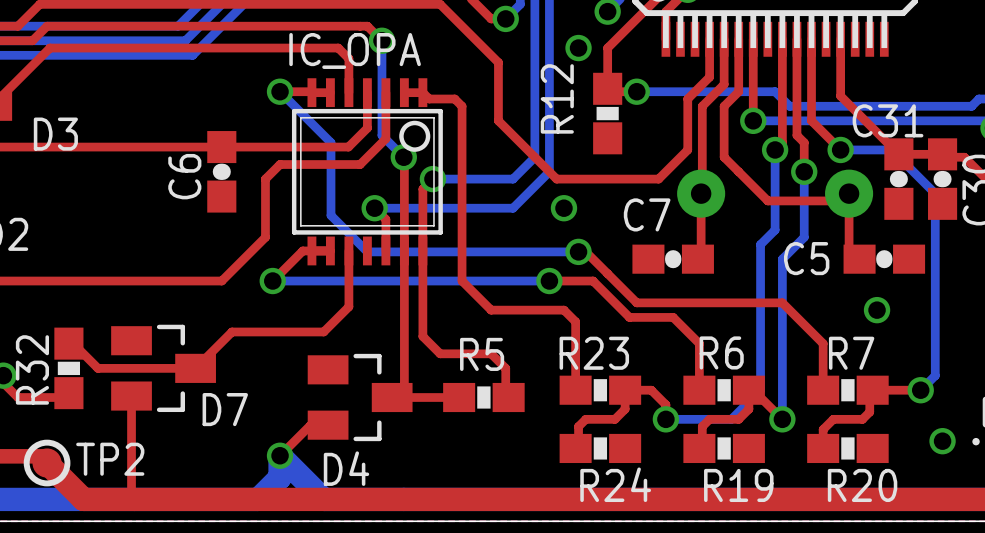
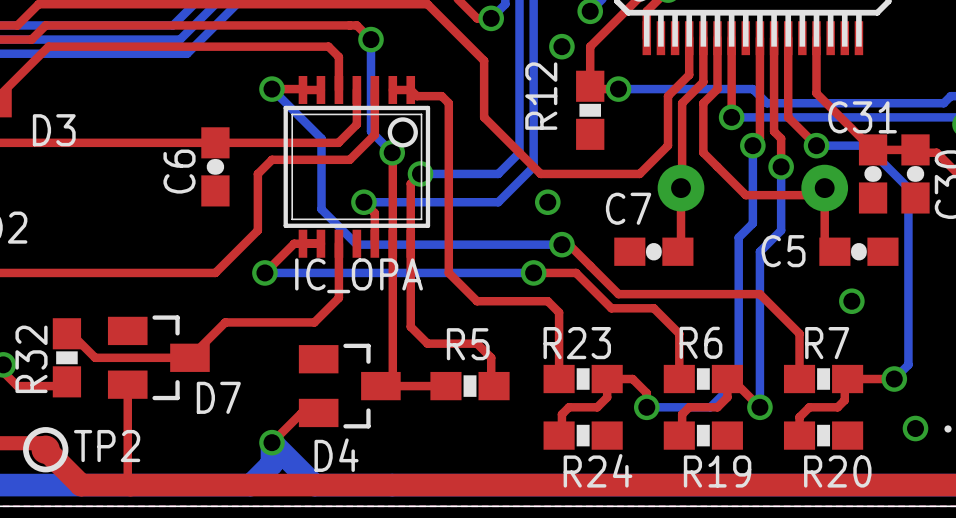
IC_OPA name position: IC_OPA (355, 50) -> IC_OPA (359, 275)

